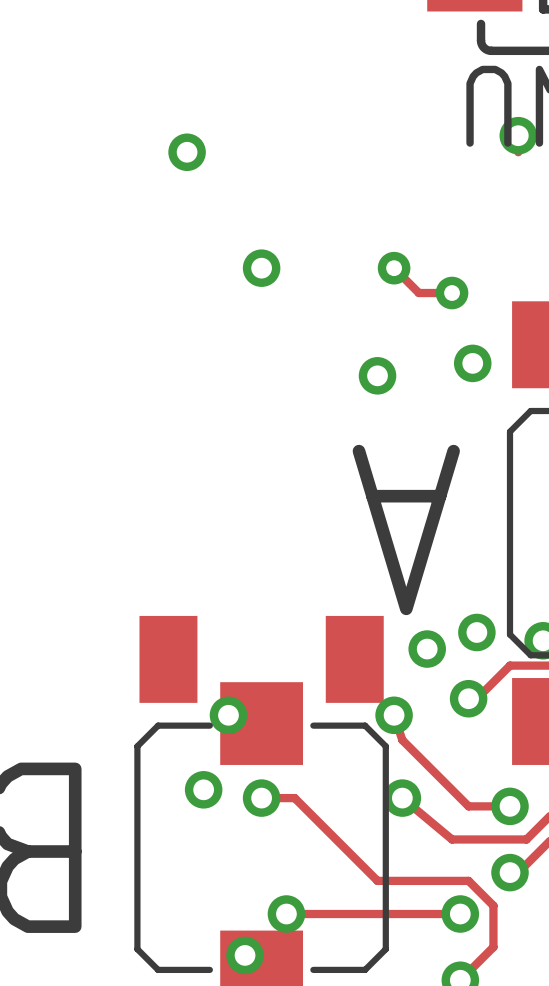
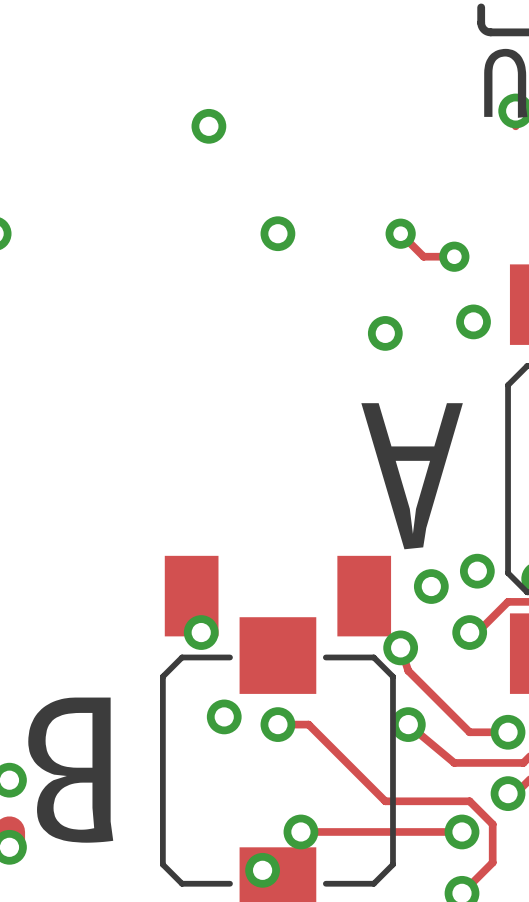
via position: (228, 715) -> (201, 632)

